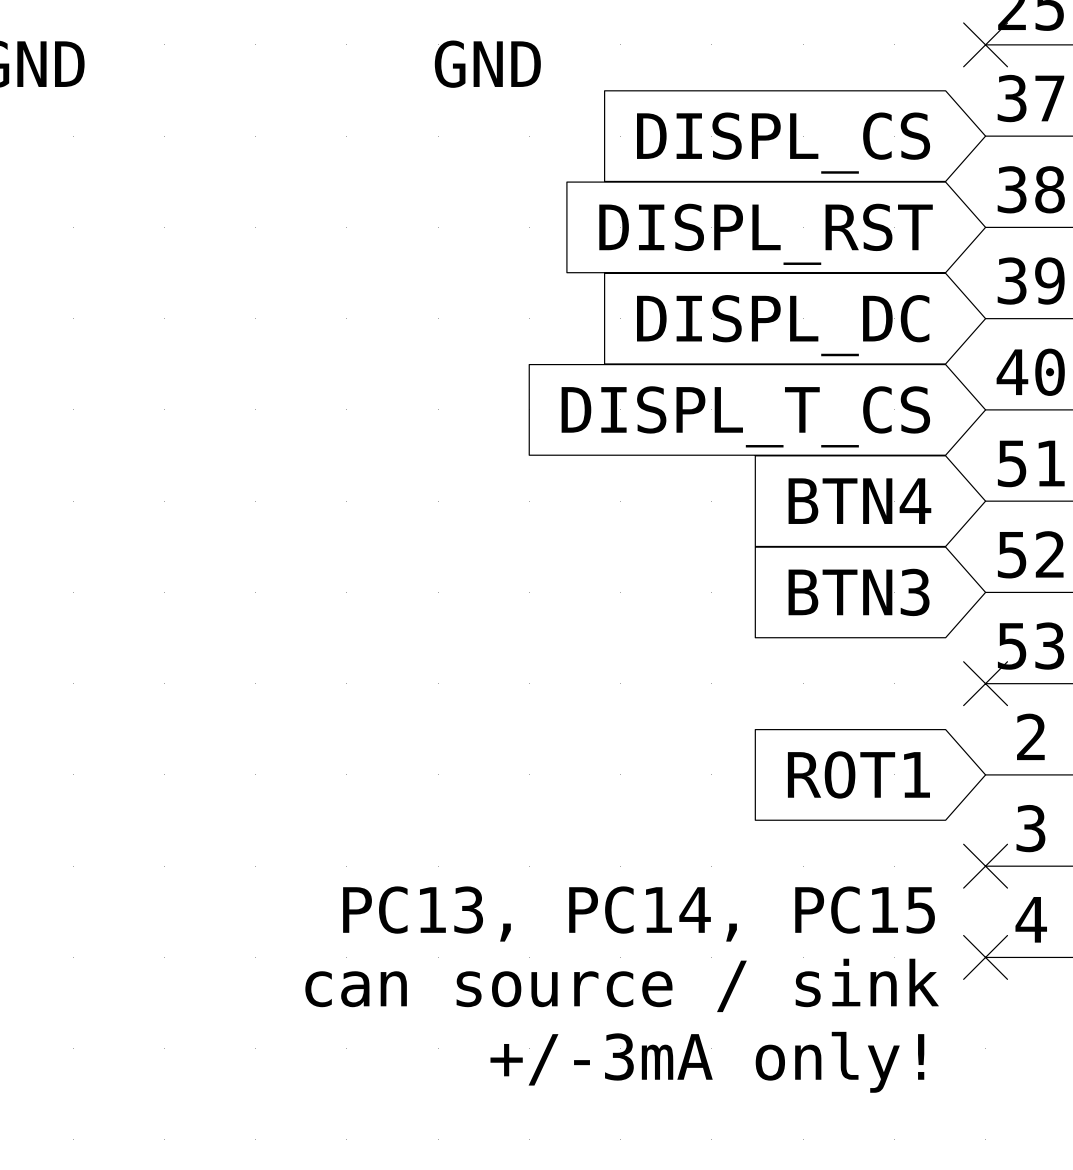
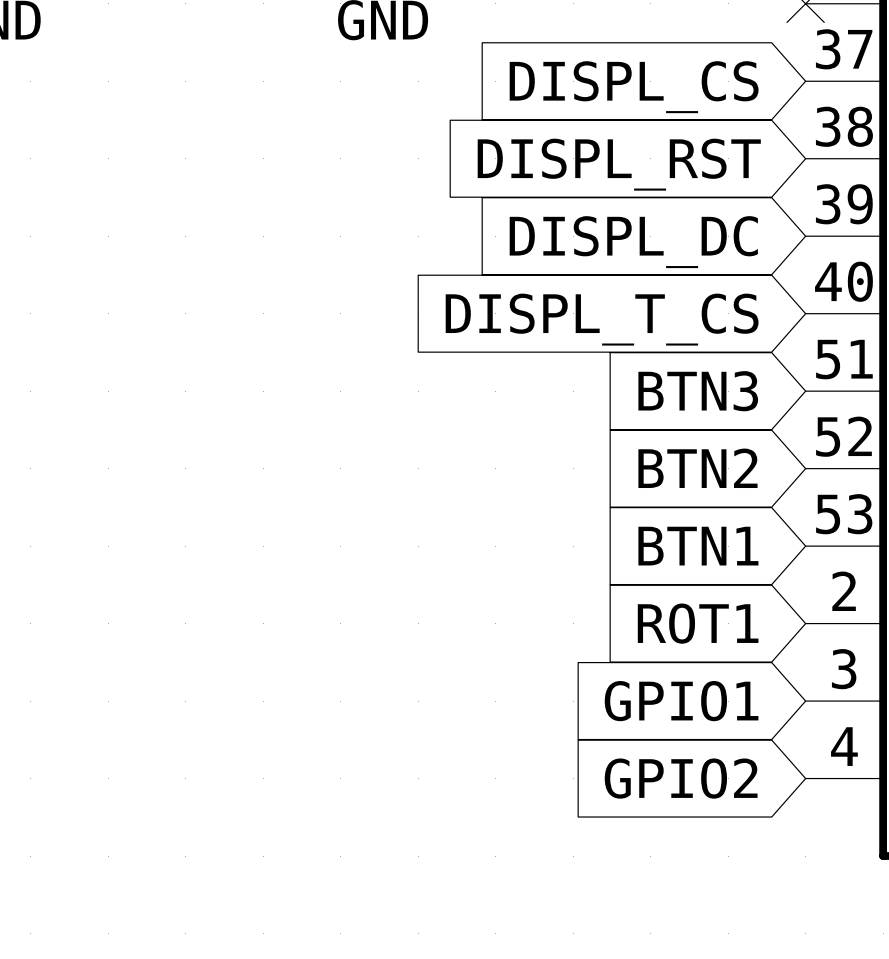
global label: BTN4 (859, 501) -> BTN3 (698, 391)
global label: BTN3 (859, 592) -> BTN2 (697, 468)
global label: none -> BTN1 (698, 546)
no-connect mark: (985, 683) -> none
global label: none -> GPIO1 (681, 701)
no-connect mark: (985, 866) -> none
text: PC13, PC14, PC15 (639, 913) -> none
global label: none -> GPIO2 (681, 778)
no-connect mark: (985, 957) -> none
text: can source / sink (622, 985) -> none
text: +/-3mA only! (707, 1062) -> none

